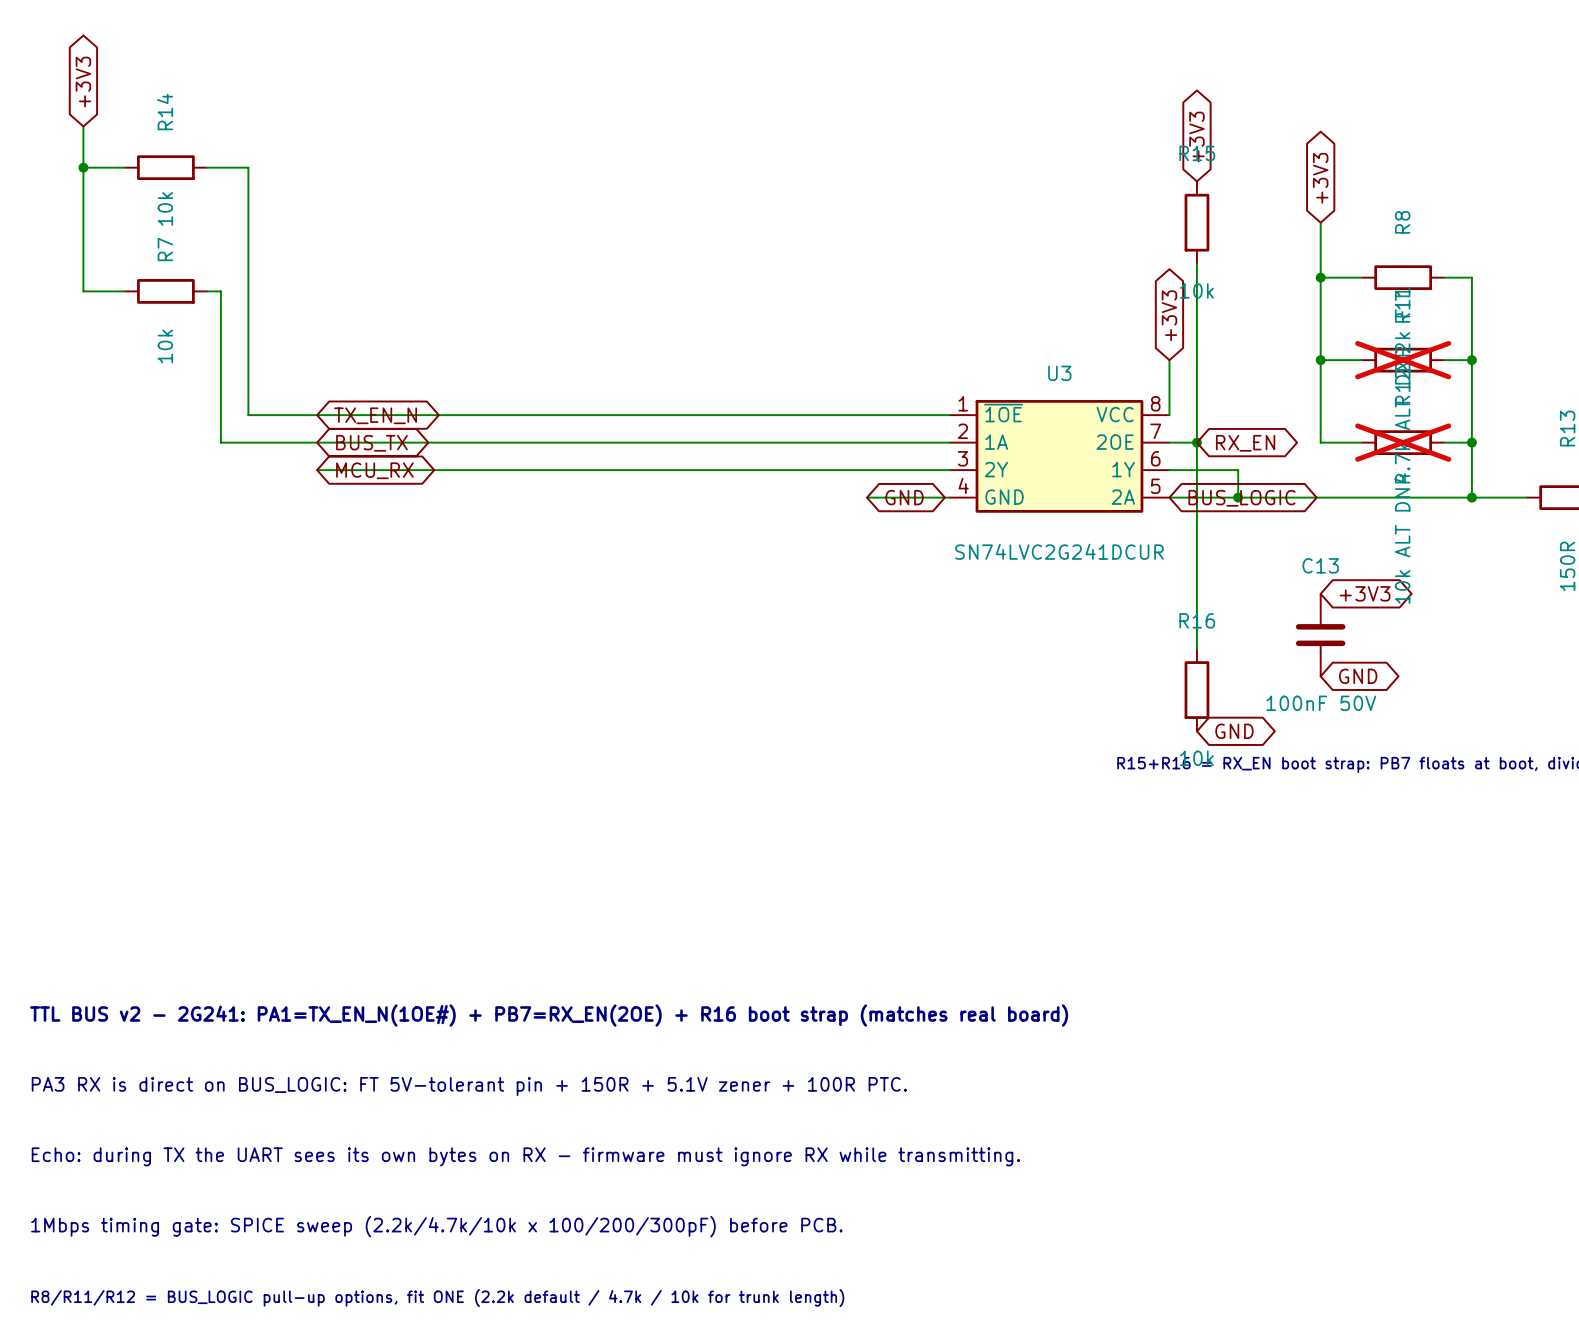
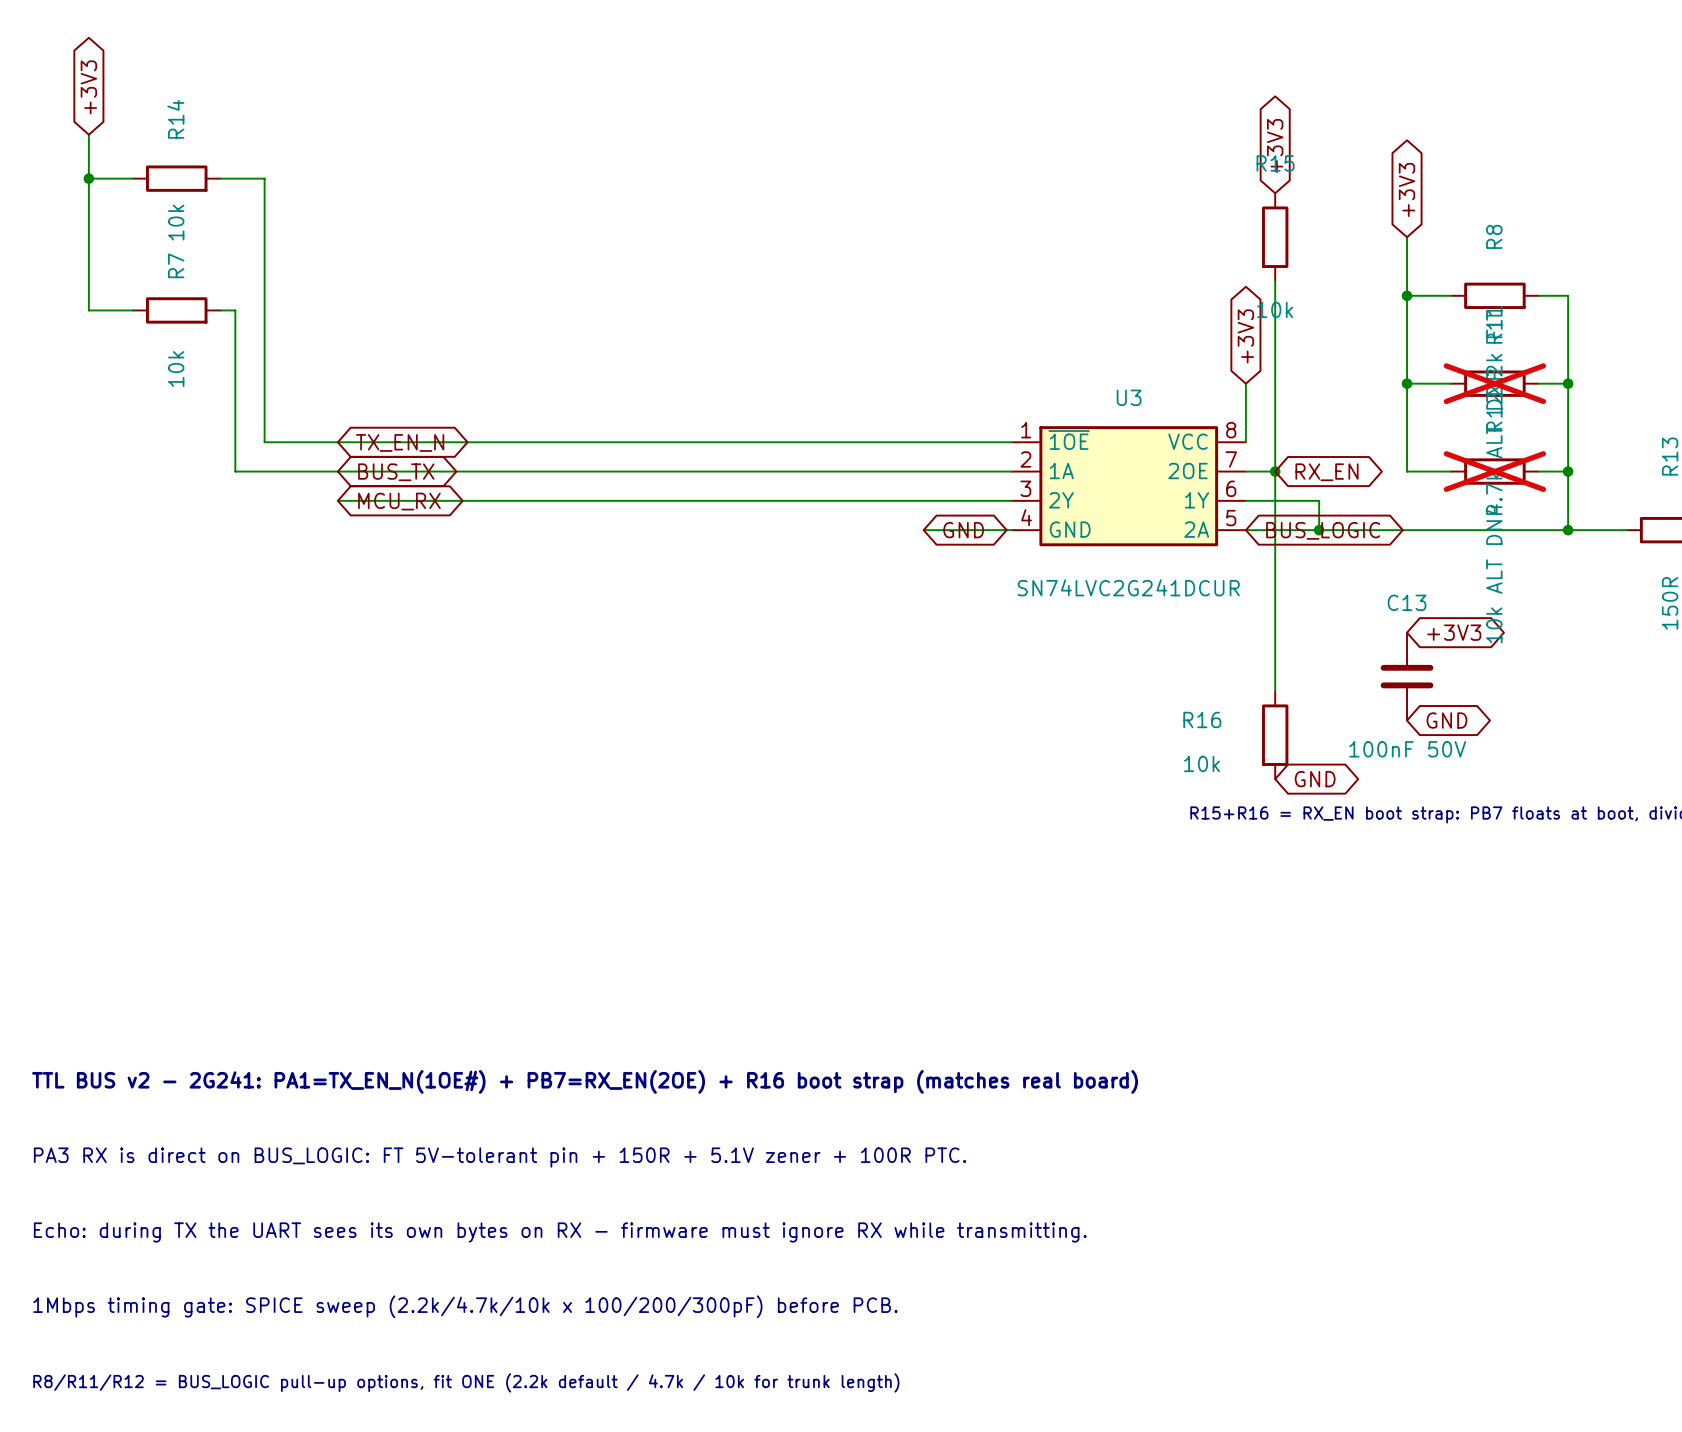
R16 name position: R16 (1197, 620) -> R16 (1202, 719)
R16 value position: 10k (1196, 758) -> 10k (1201, 763)

